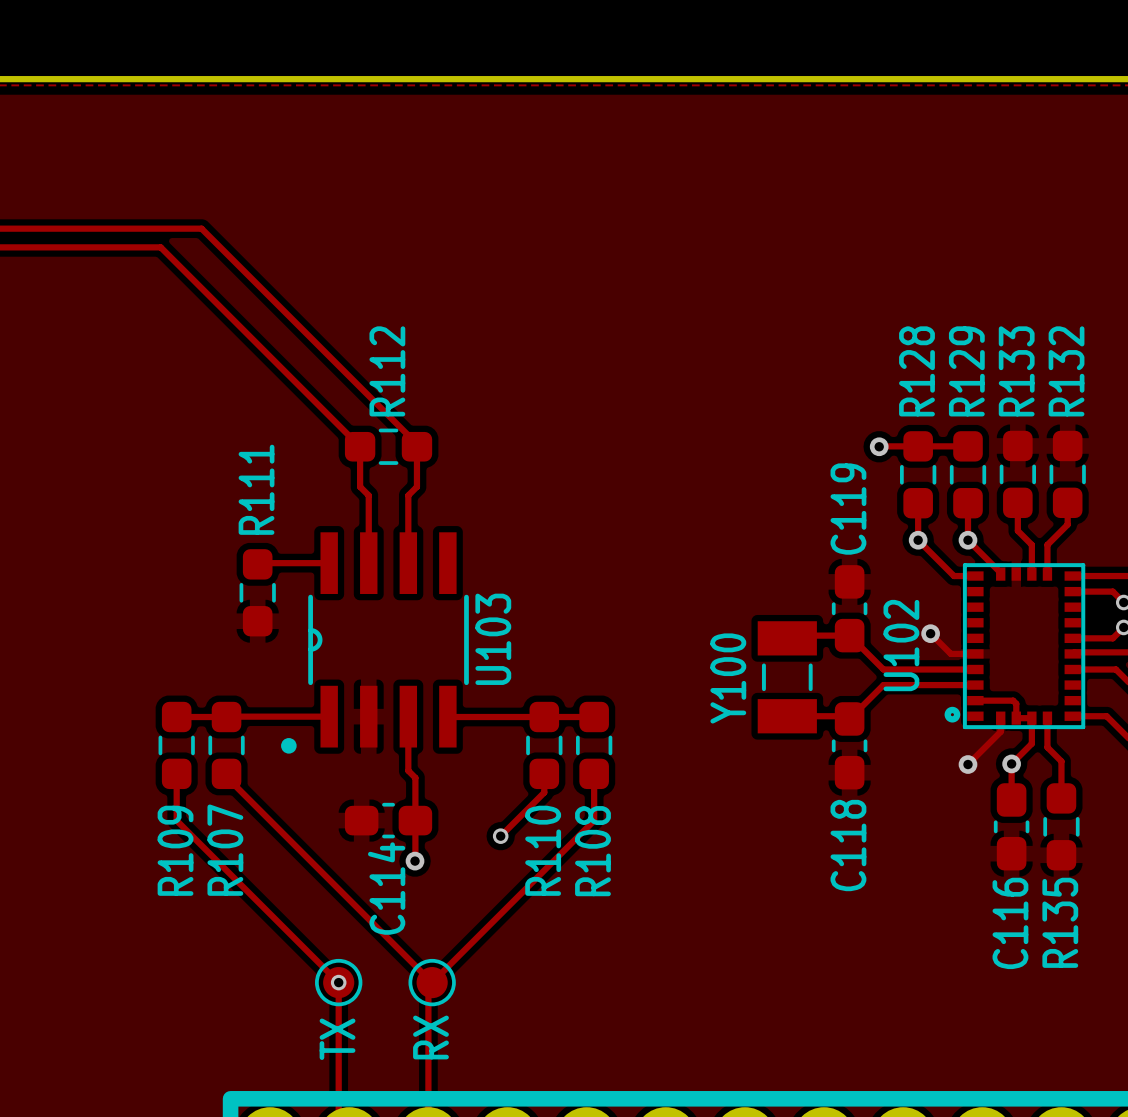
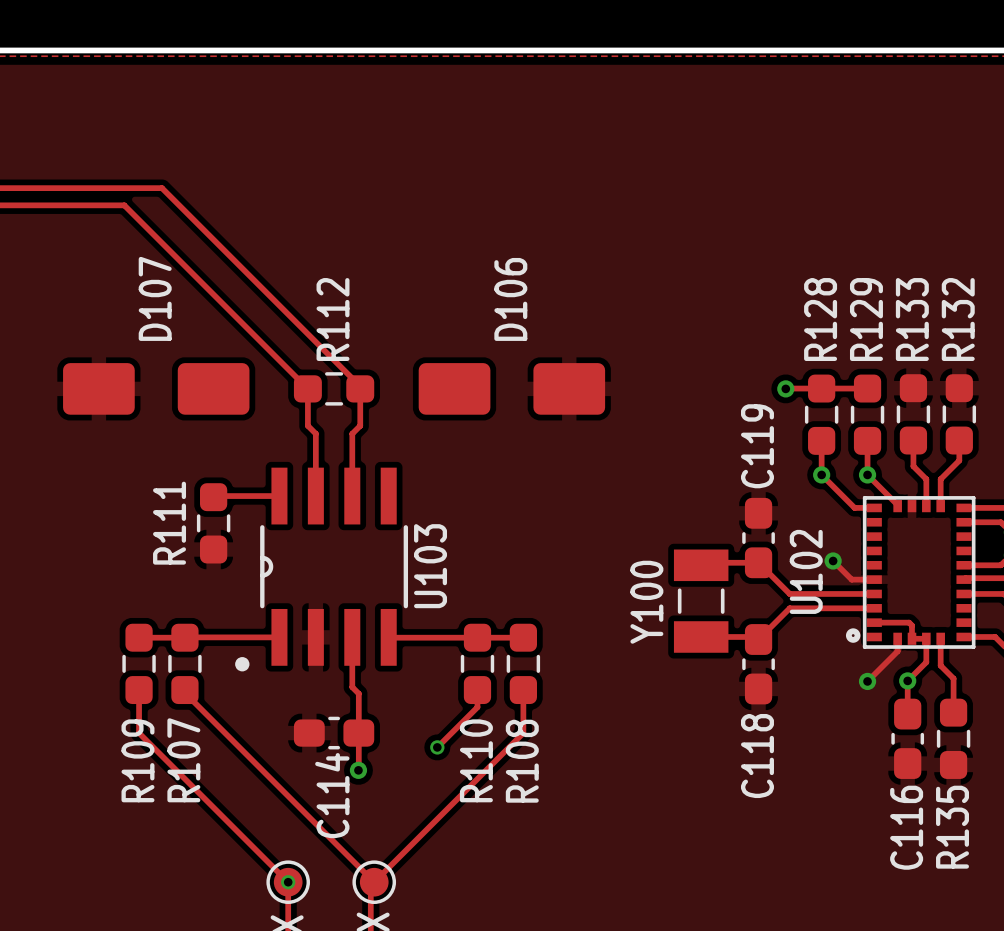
D107: none -> (156, 388)
D106: none -> (511, 388)
R111 name position: R111 (256, 489) -> R111 (169, 523)

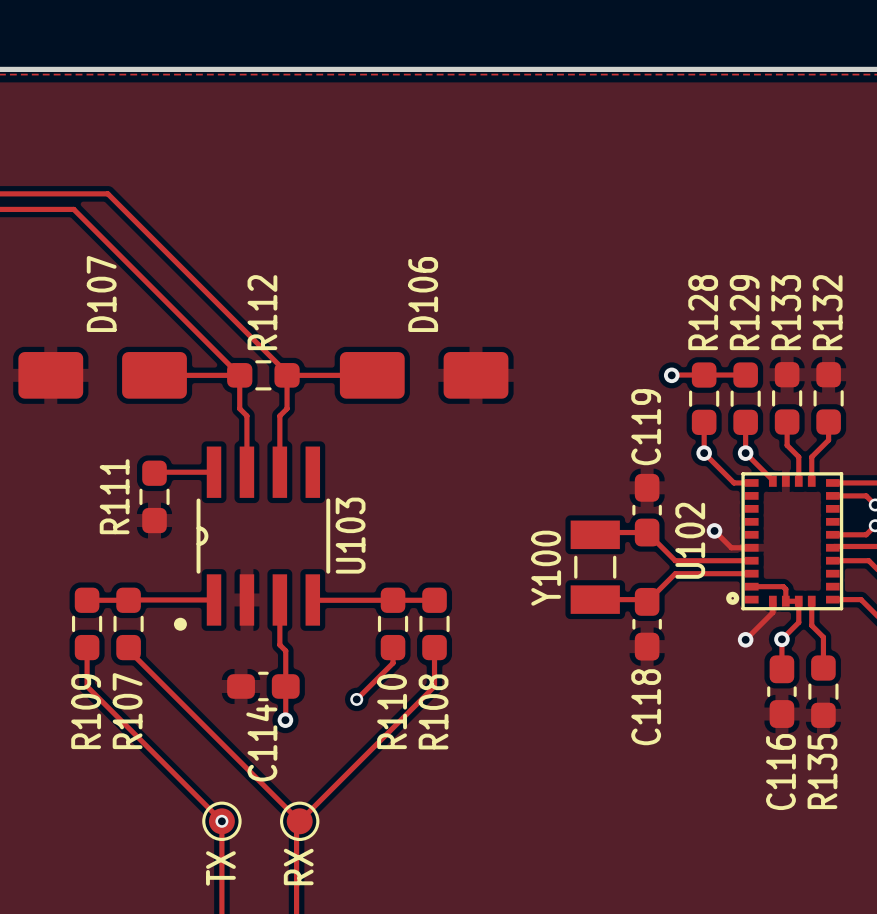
track: none -> (154, 375) (239, 375)
track: none -> (287, 375) (372, 375)

